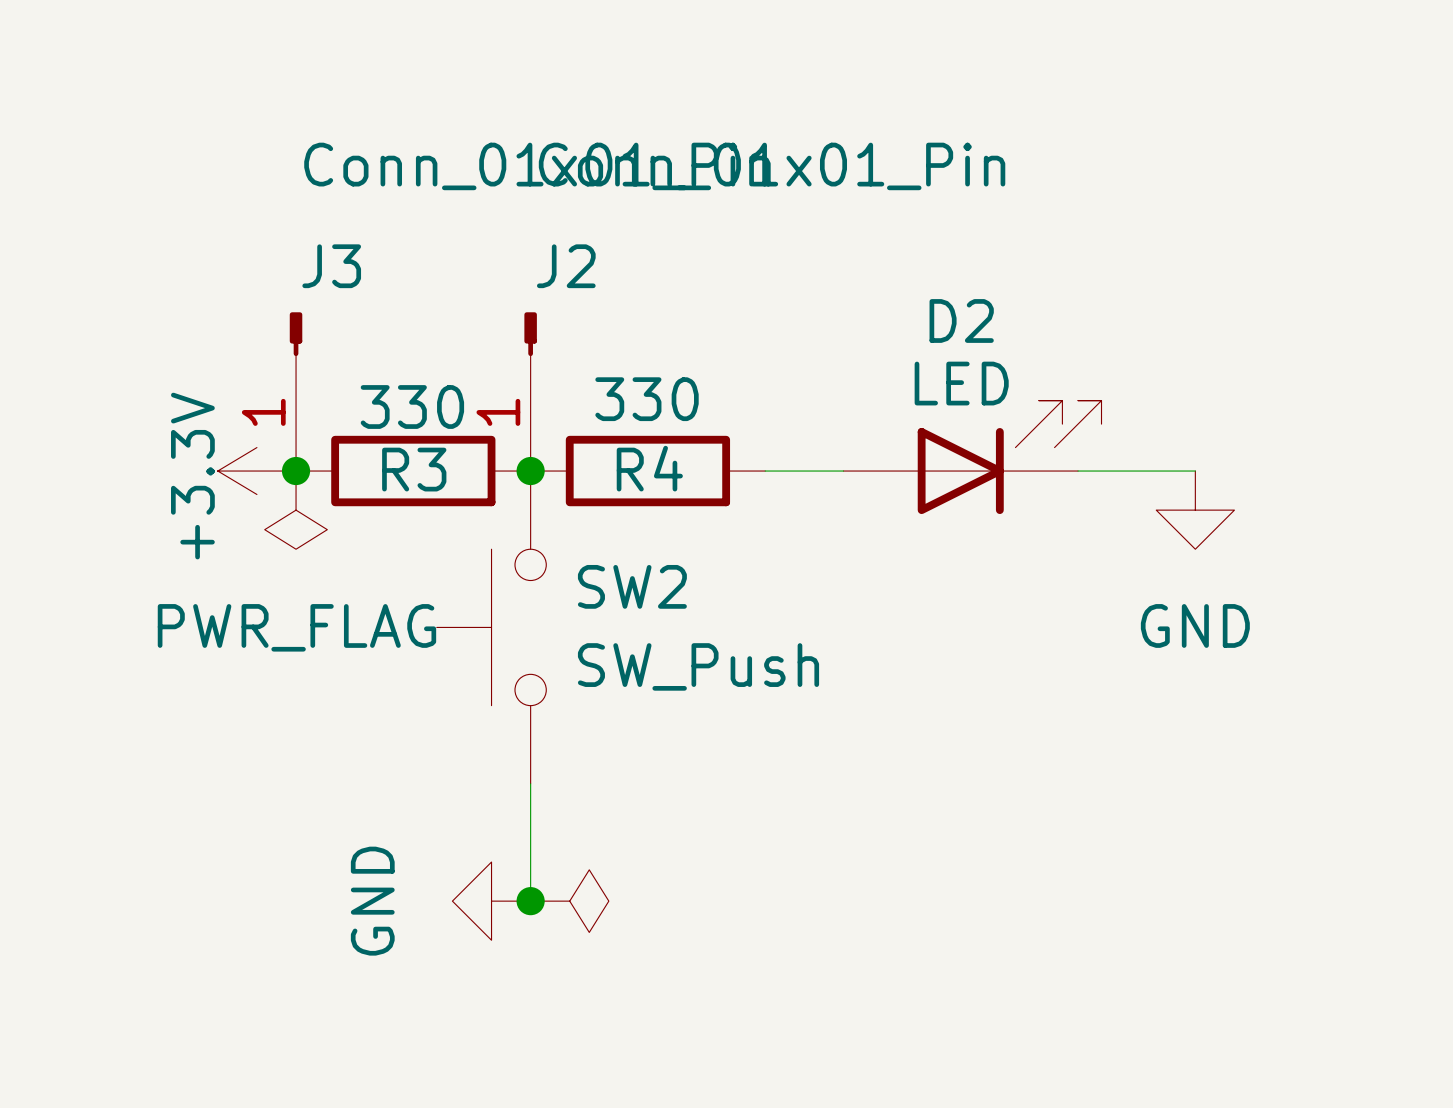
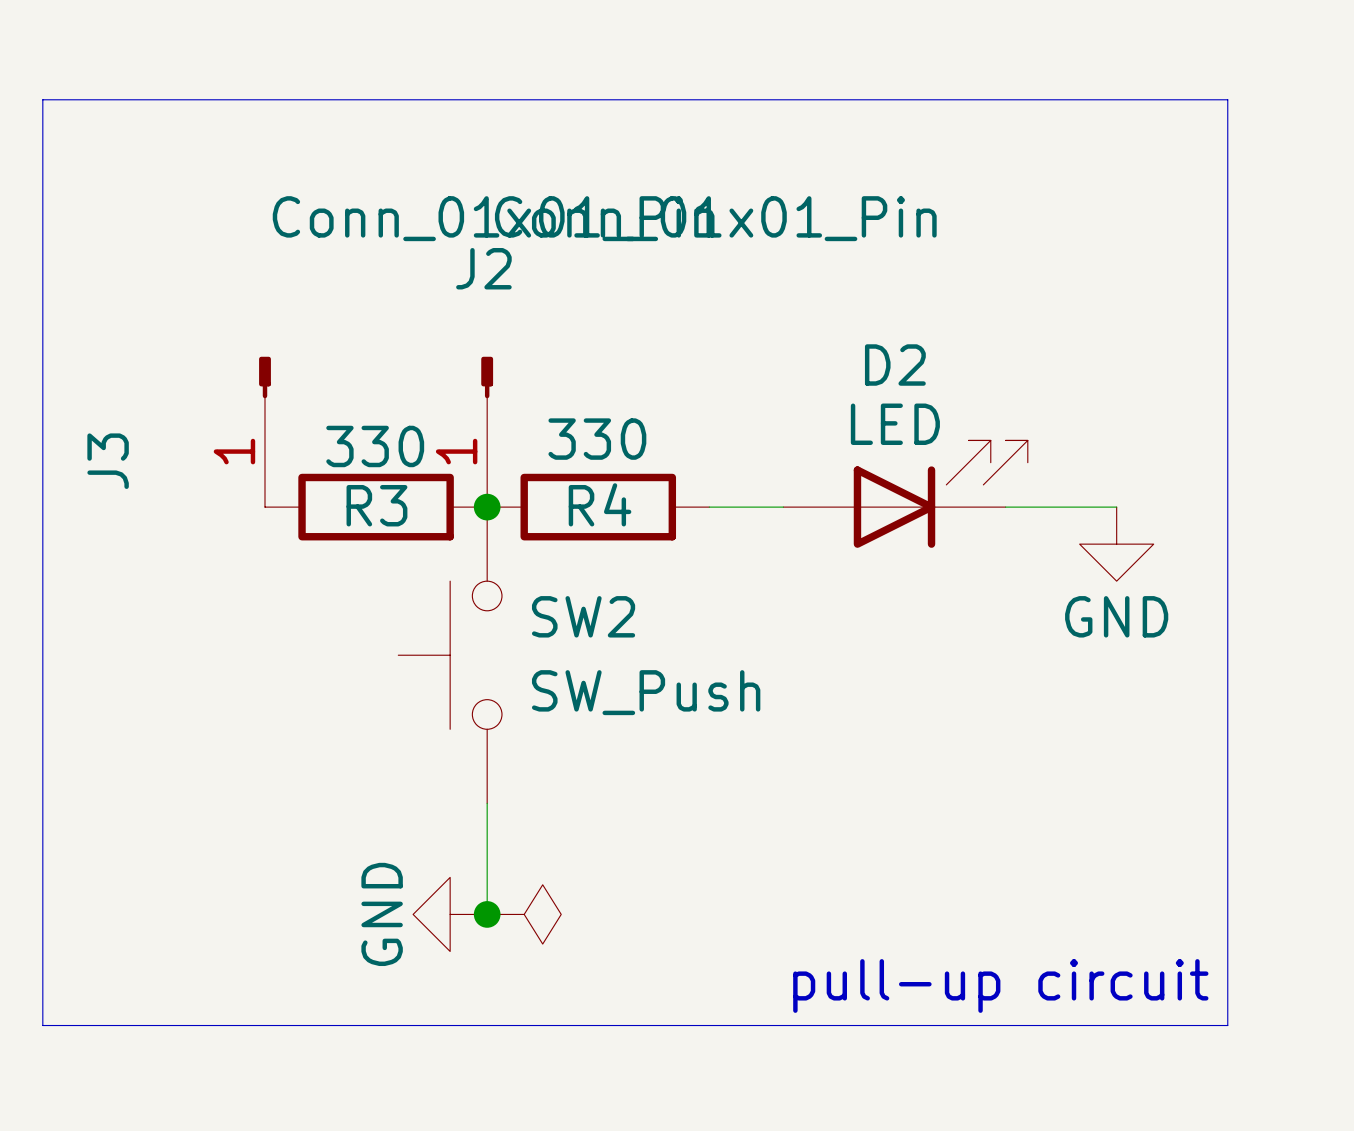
line: none -> (42, 99) (1227, 99) (1227, 1025) (42, 1025) (42, 99)
J3 name rotation: 0° (331, 266) -> 90° counterclockwise (108, 461)
J3 name position: J3 (331, 266) -> J3 (108, 461)
J2 name position: J2 (566, 266) -> J2 (483, 268)
power symbol: +3.3V (256, 471) -> none
junction: (296, 471) -> none
power symbol: PWR_FLAG (296, 510) -> none
power symbol text position: GND (1195, 625) -> GND (1116, 616)
power symbol text position: GND (372, 901) -> GND (382, 914)
text: none -> pull-up circuit (1000, 985)

